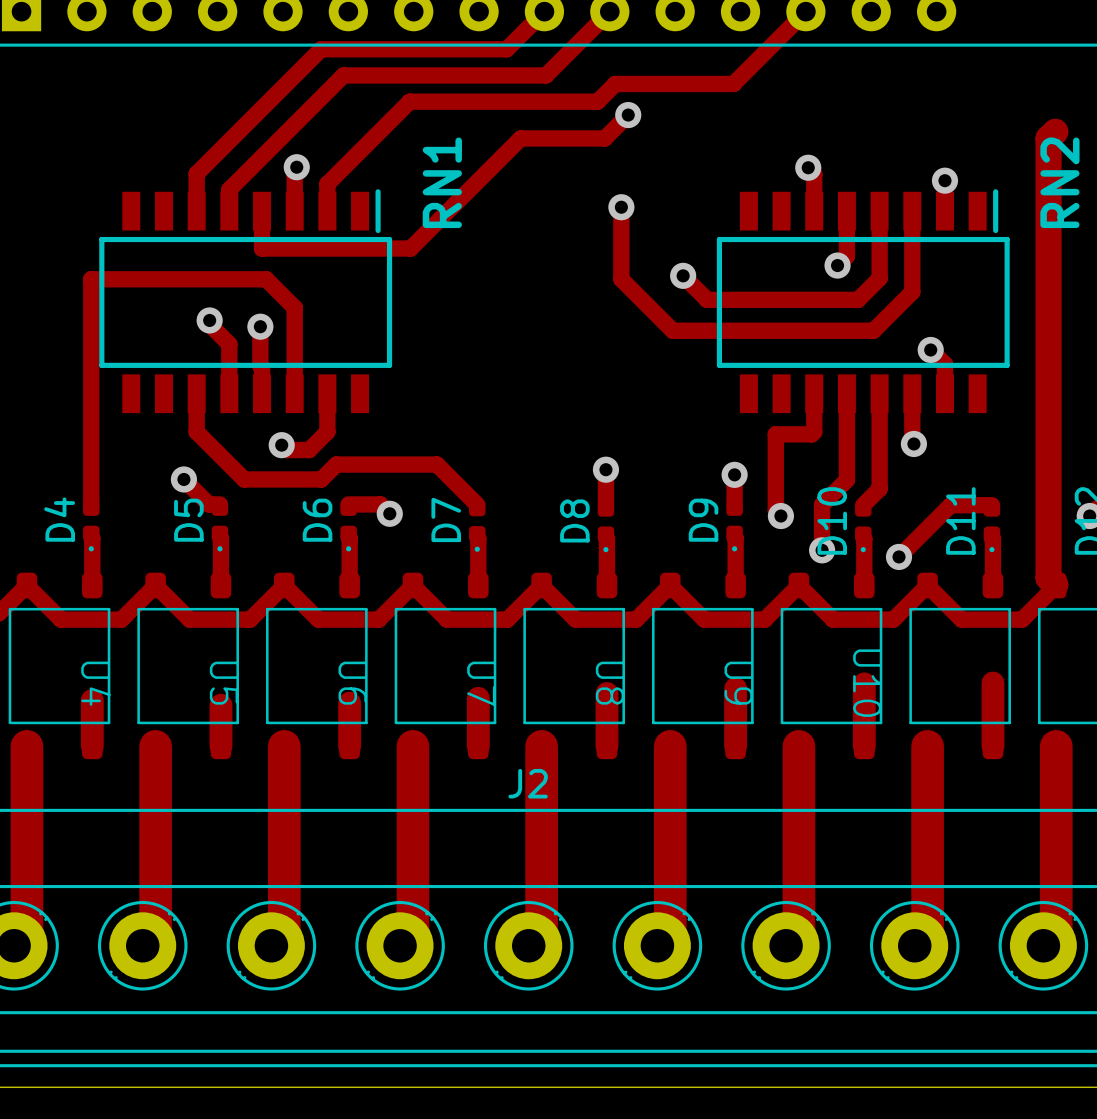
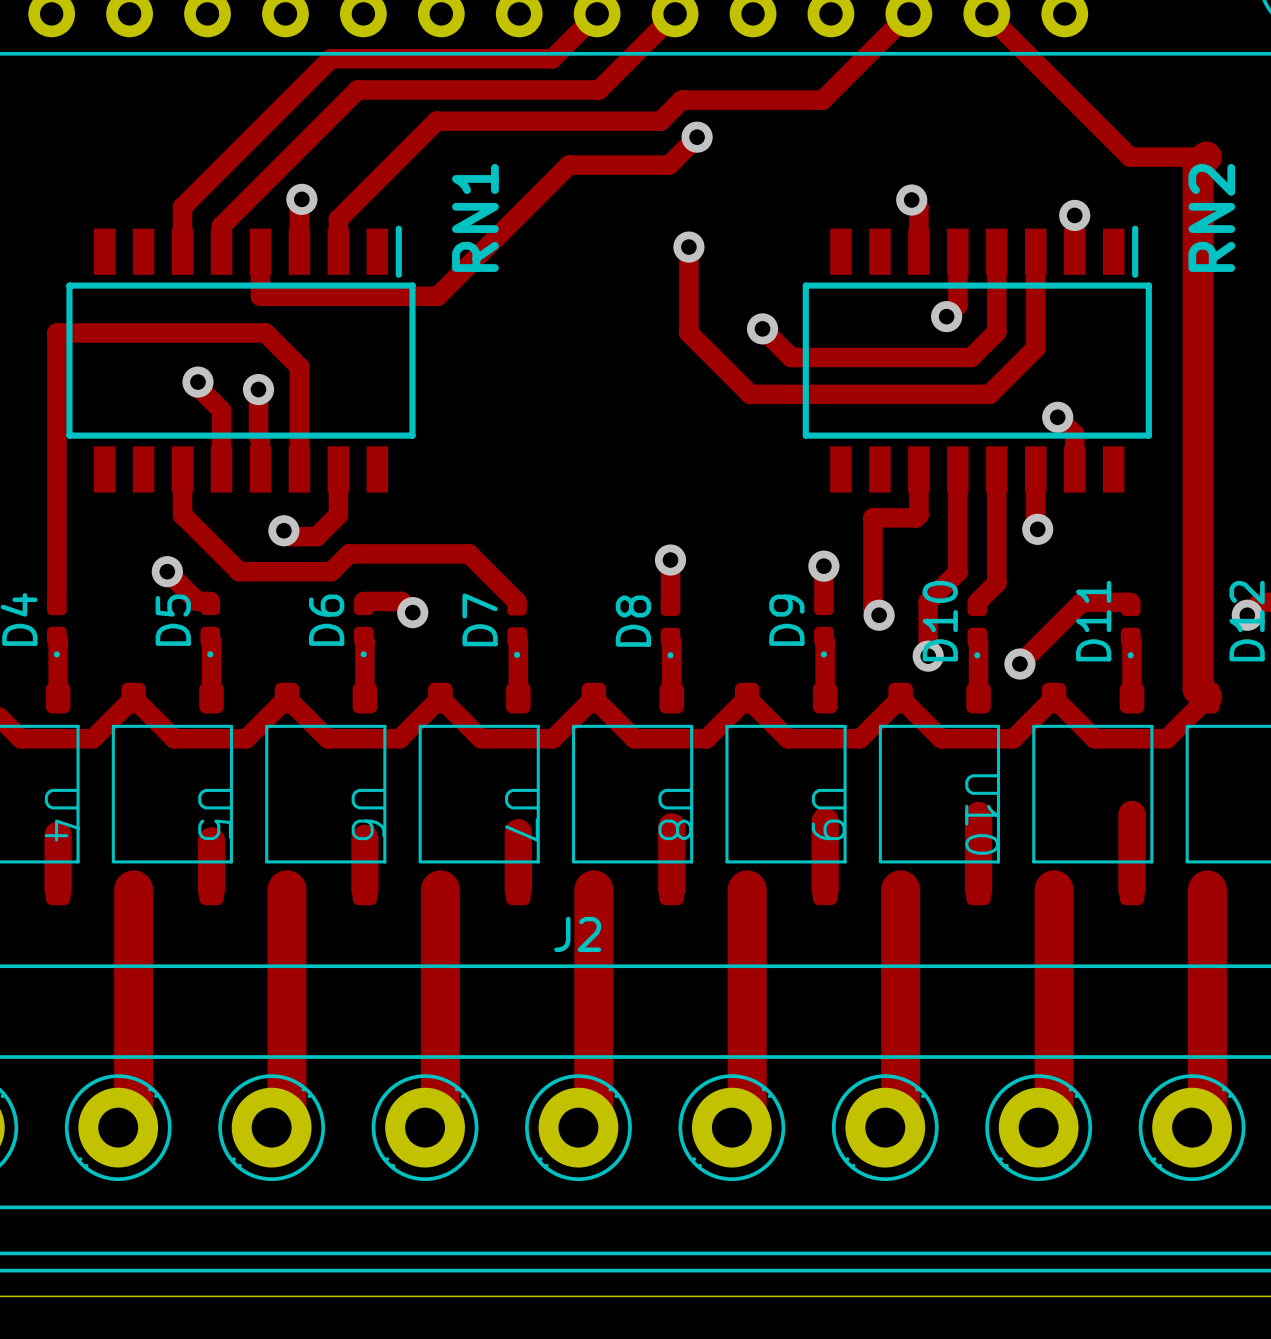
track: none -> (986, 13) (1129, 157) (1206, 157)

